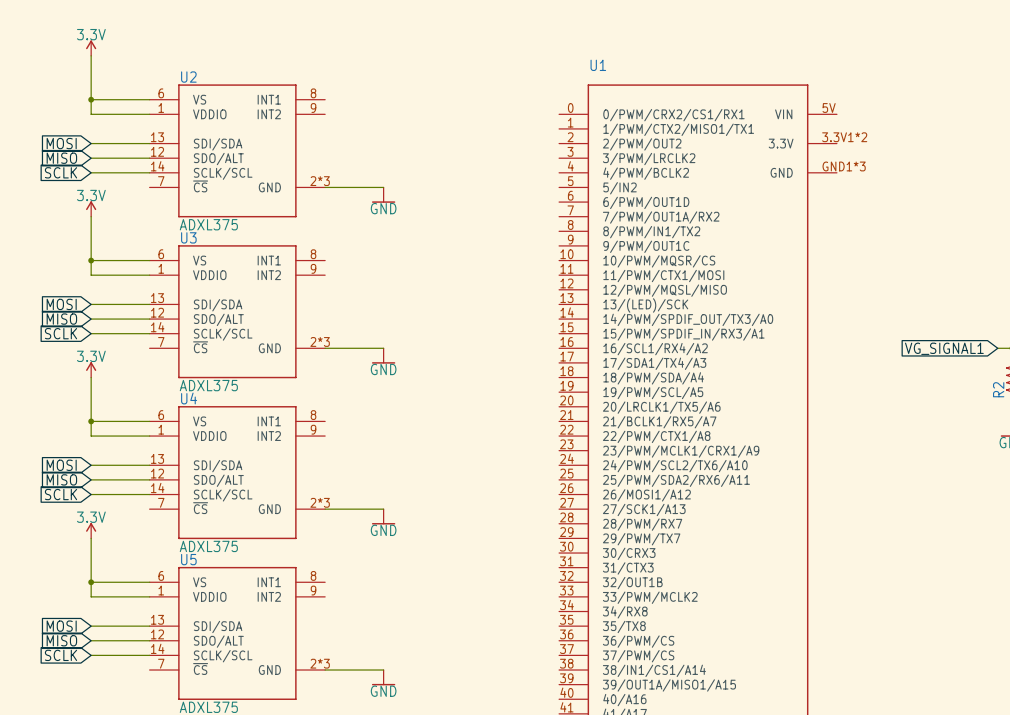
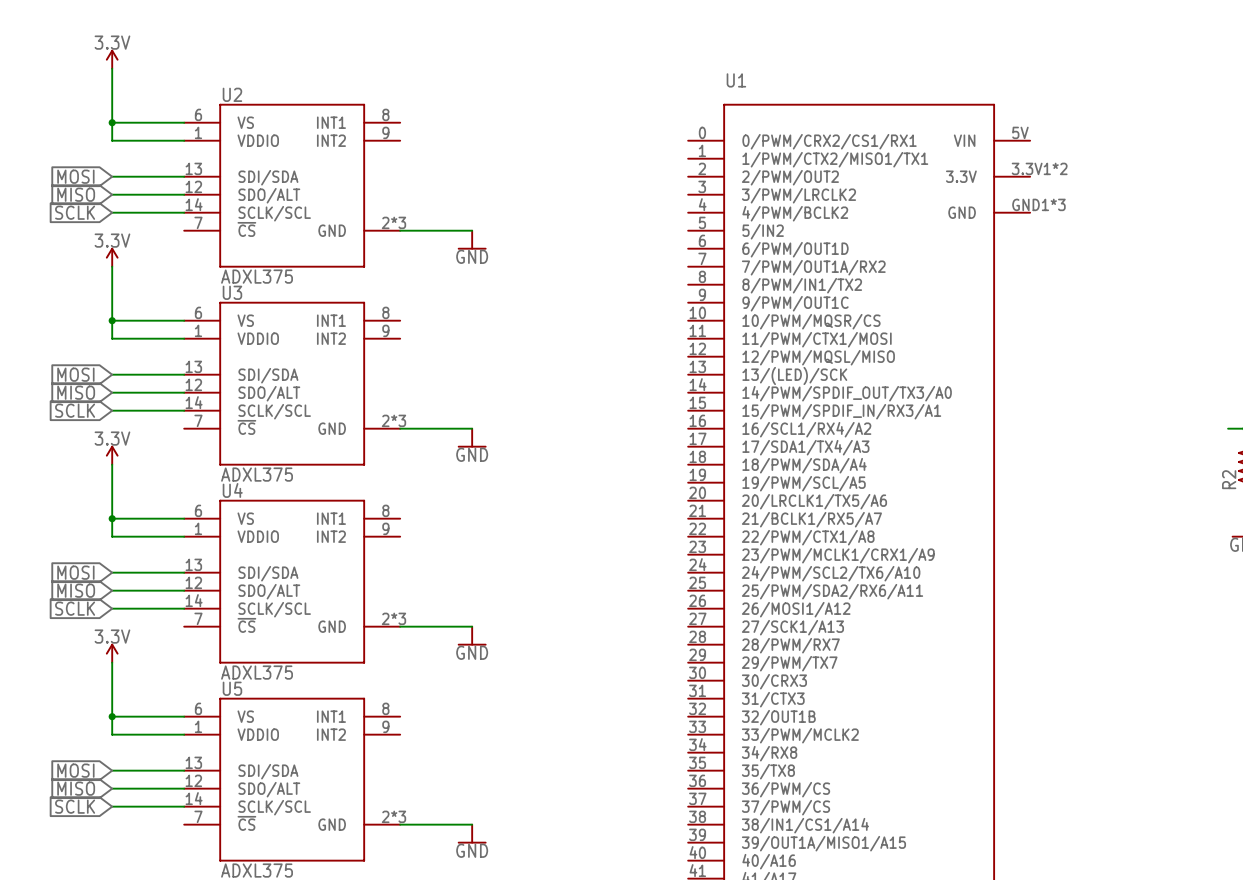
global label: VG_SIGNAL1 (944, 348) -> none

